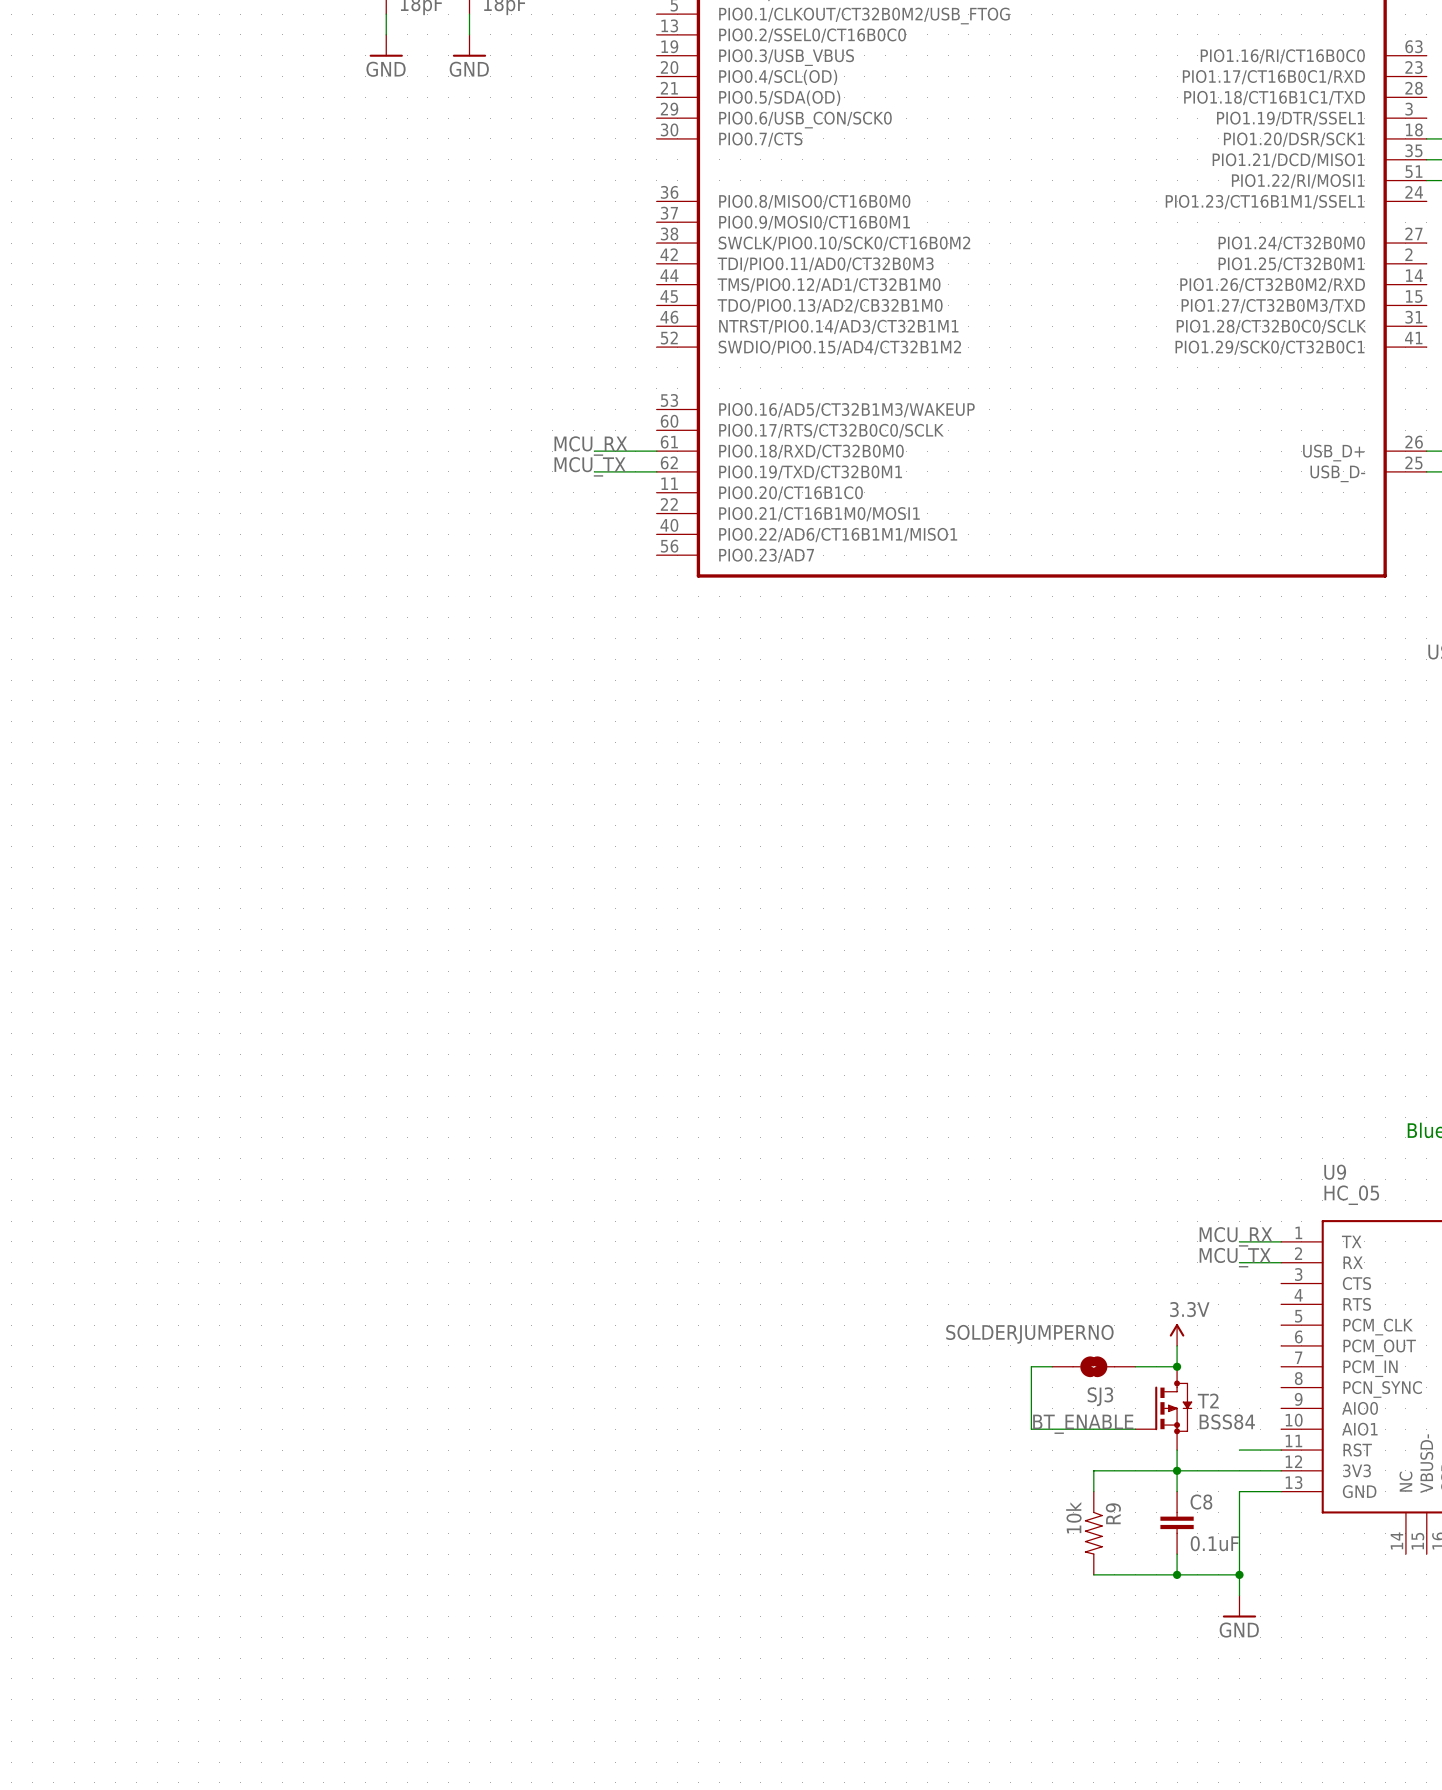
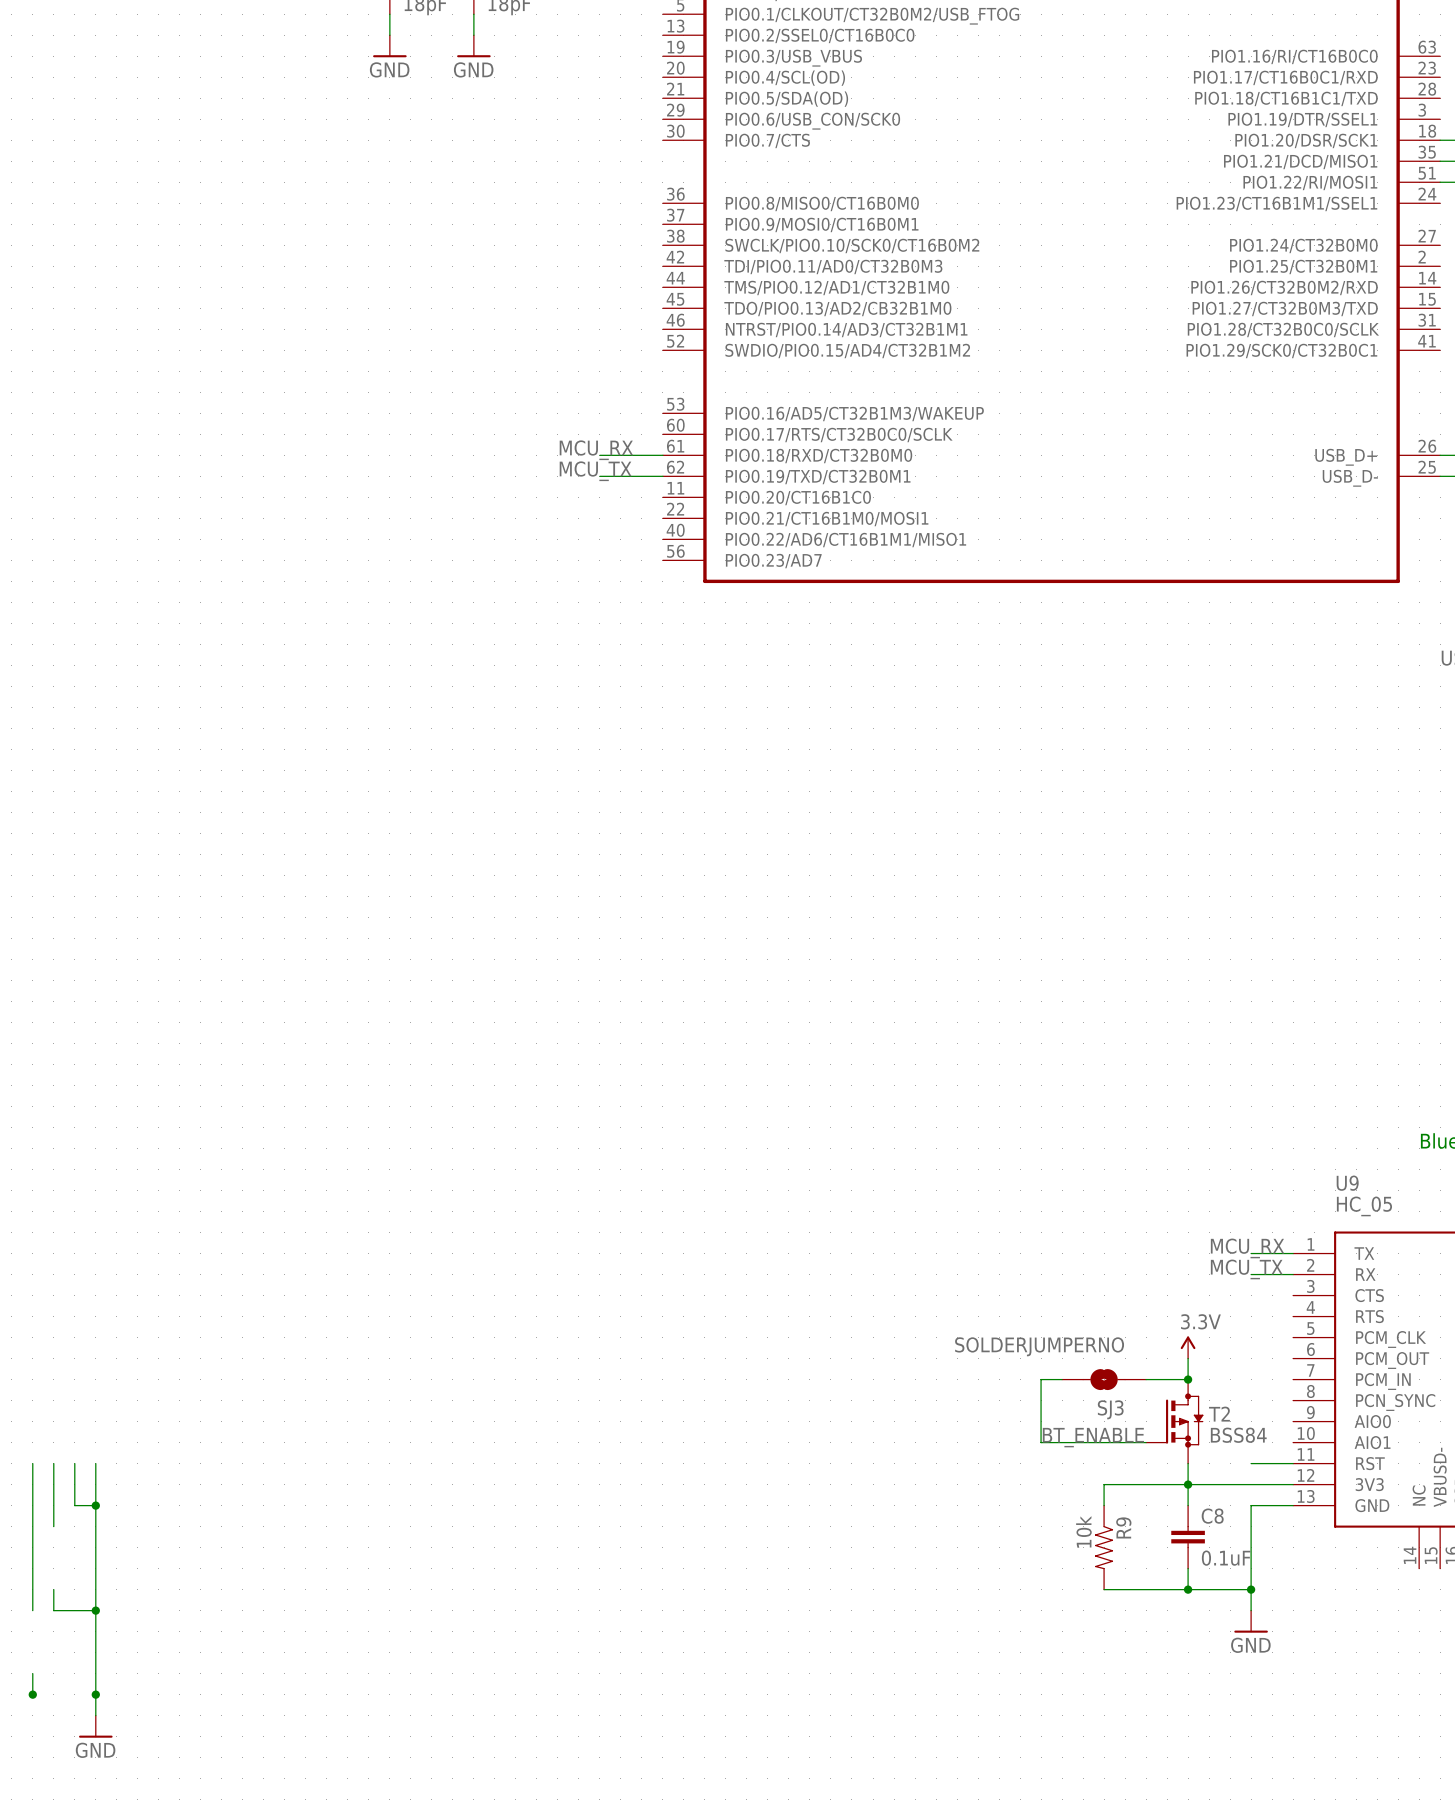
wire: none -> (32, 1463) (32, 1610)
wire: none -> (53, 1463) (53, 1526)
wire: none -> (74, 1463) (74, 1505) (95, 1505)
wire: none -> (95, 1463) (95, 1715)
junction: none -> (95, 1505)
wire: none -> (53, 1589) (53, 1610) (95, 1610)
junction: none -> (95, 1610)
wire: none -> (32, 1673) (32, 1694)
junction: none -> (32, 1694)
junction: none -> (95, 1694)
power symbol: none -> GND (95, 1726)

